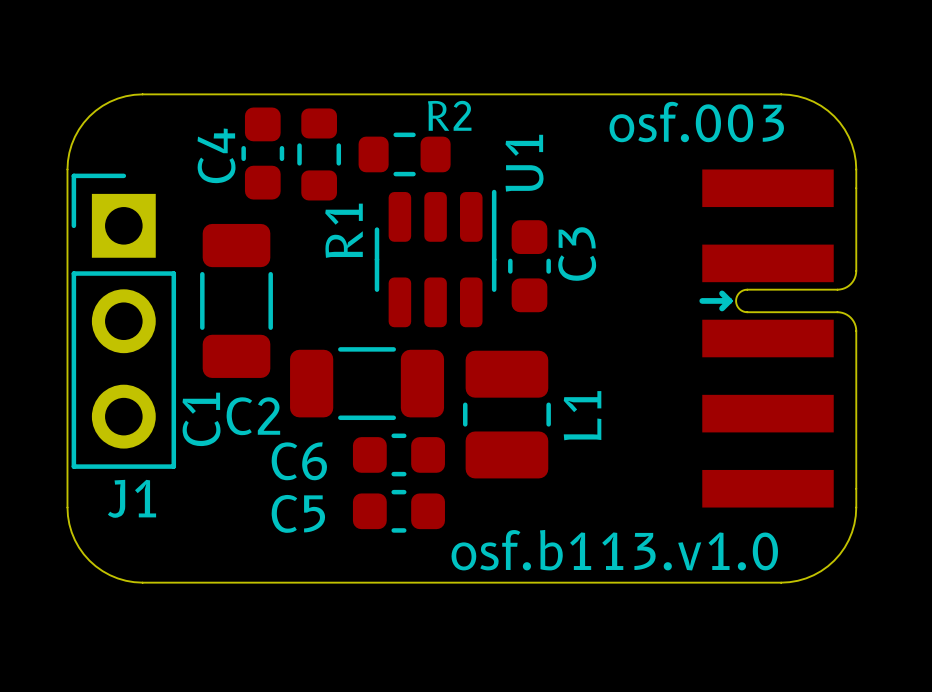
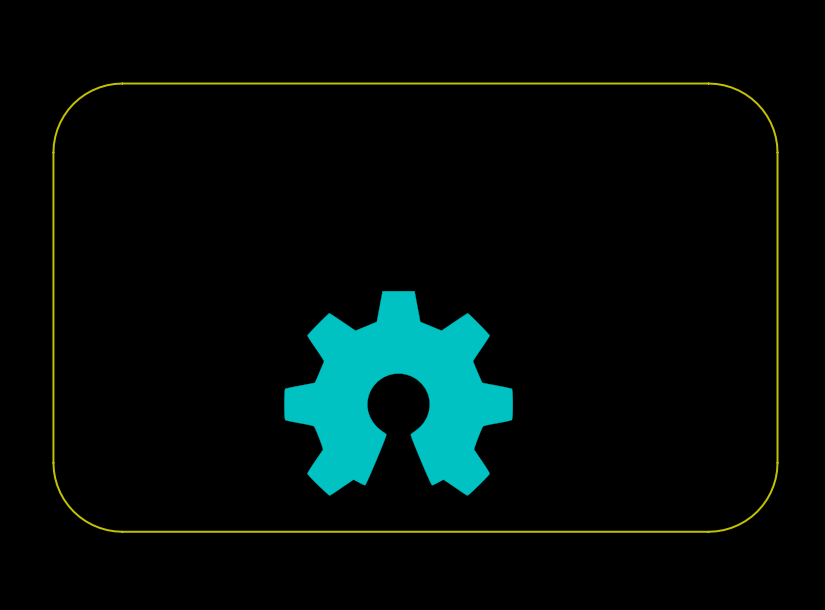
text: osf.003 (696, 122) -> none
C4: (262, 153) -> none
R1: (319, 154) -> none
R2: (404, 154) -> none
board edge: none -> (777, 169) (777, 445)
U1: (435, 258) -> none
C3: (529, 266) -> none
C1: (236, 300) -> none
drawing: none -> [284, 291, 513, 496]
J1: (123, 321) -> none
part: (778, 338) -> none
C2: (367, 383) -> none
L1: (506, 414) -> none
C6: (398, 454) -> none
C5: (398, 511) -> none
text: osf.b113.v1.0 (614, 550) -> none

